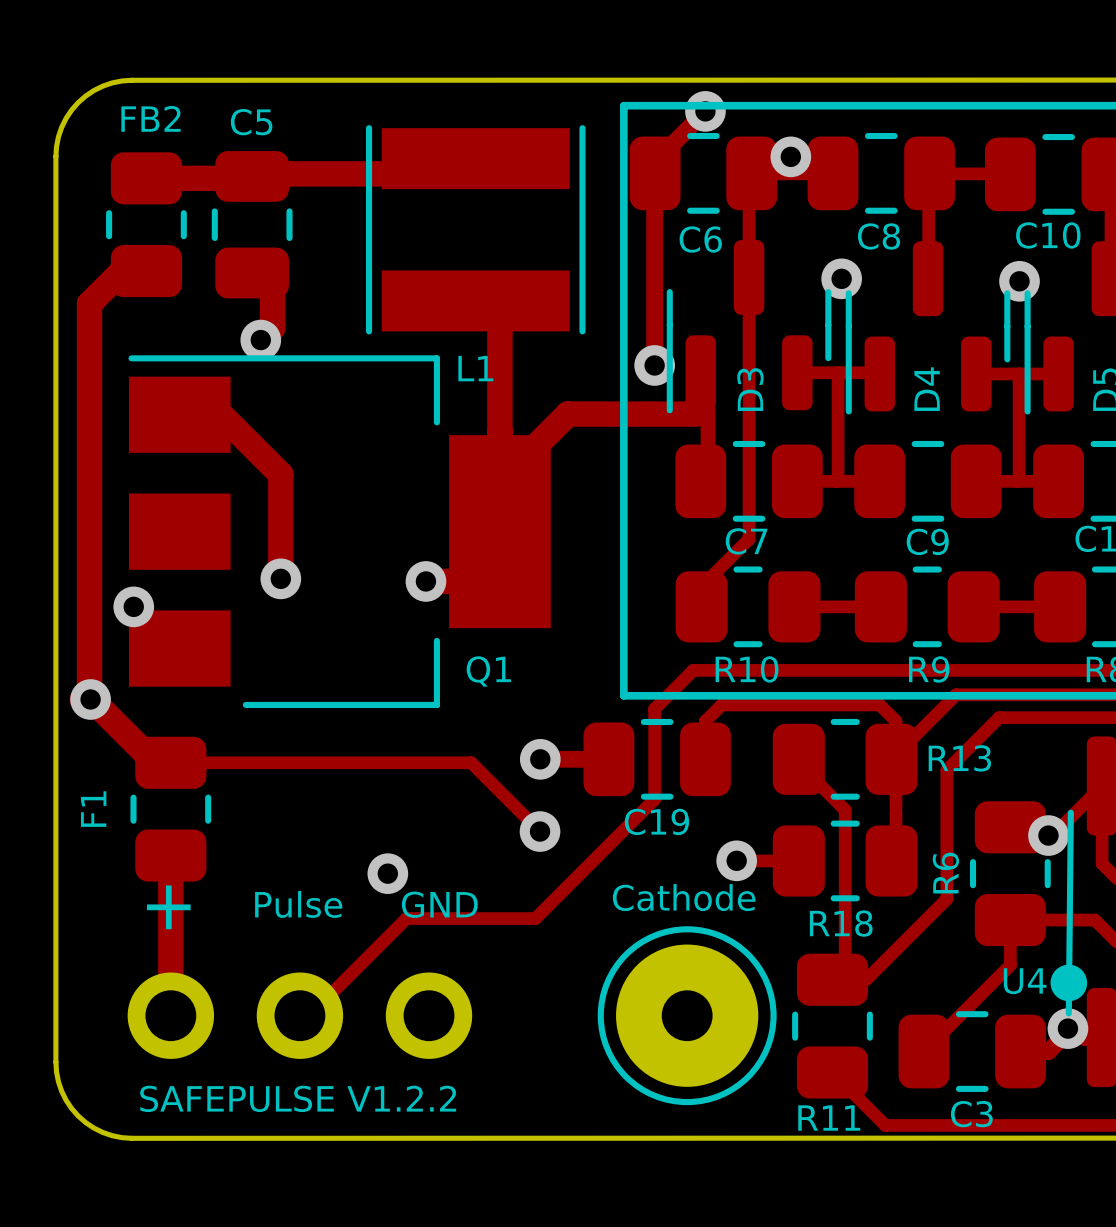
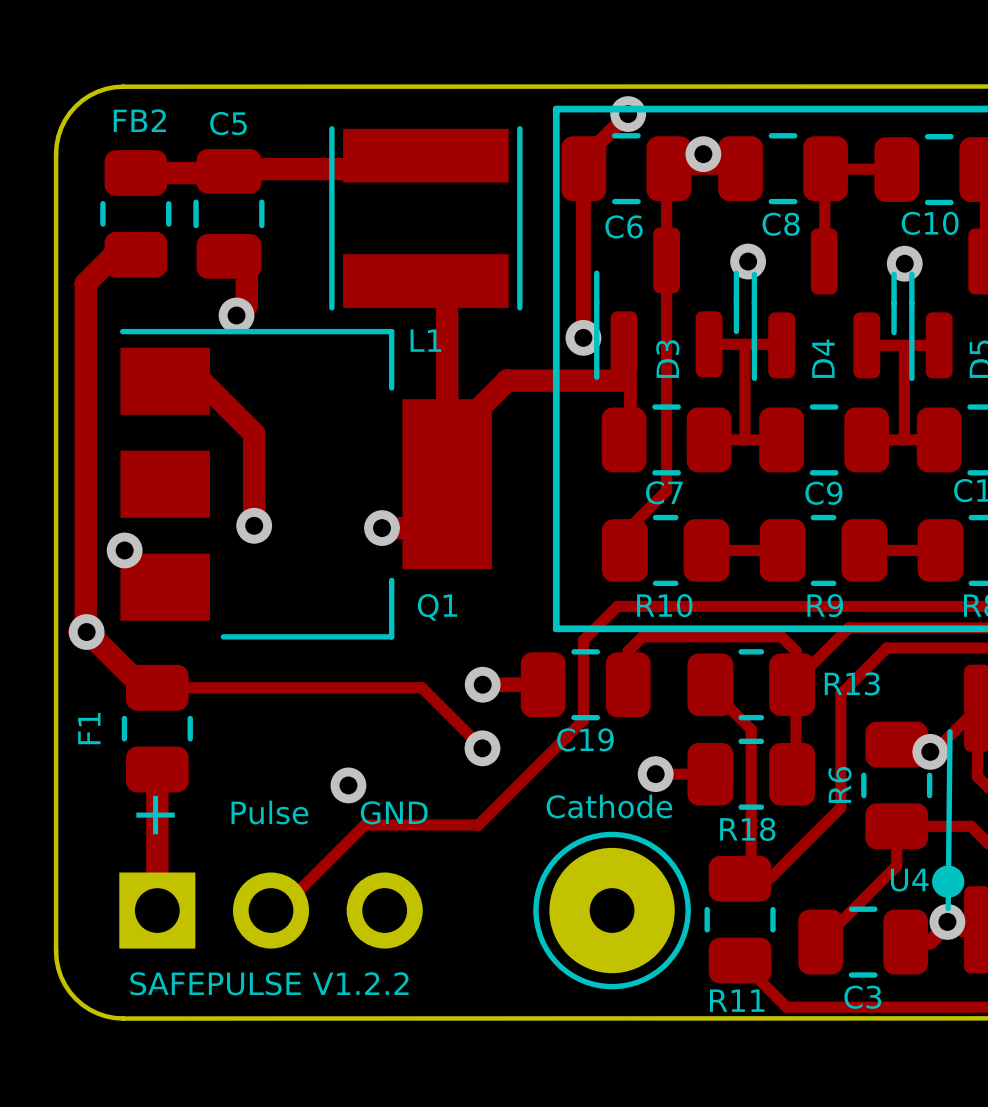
part footprint: [127, 972, 473, 1059] -> [119, 872, 423, 949]

